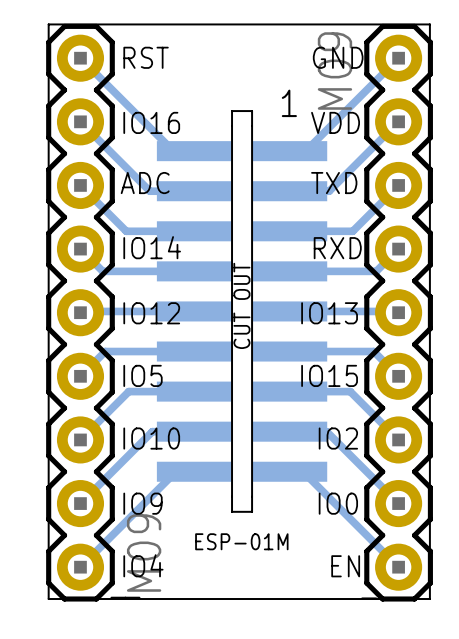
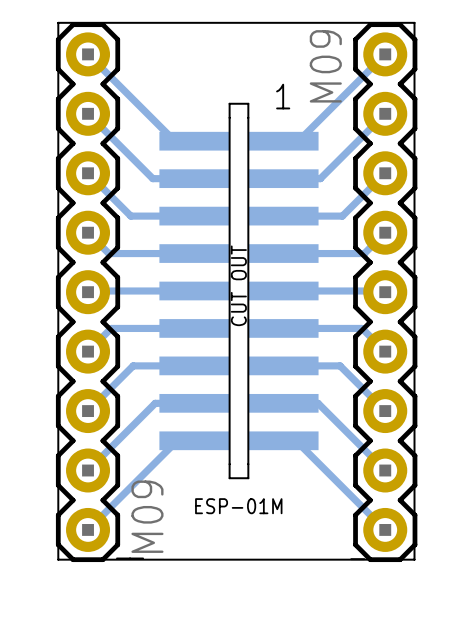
text: RST (146, 57) -> none
text: GND (338, 57) -> none
text: IO16 (151, 122) -> none
text: VDD (335, 122) -> none
text: ADC (145, 183) -> none
text: TXD (334, 183) -> none
text: IO14 (152, 247) -> none
text: RXD (337, 248) -> none
text: IO12 (151, 313) -> none
text: IO13 (329, 313) -> none
text: IO5 (143, 375) -> none
text: IO15 (329, 375) -> none
text: IO10 (151, 438) -> none
text: IO2 (338, 438) -> none
text: IO9 (143, 503) -> none
text: IO0 (338, 503) -> none
text: IO4 (143, 565) -> none
text: EN (345, 566) -> none

